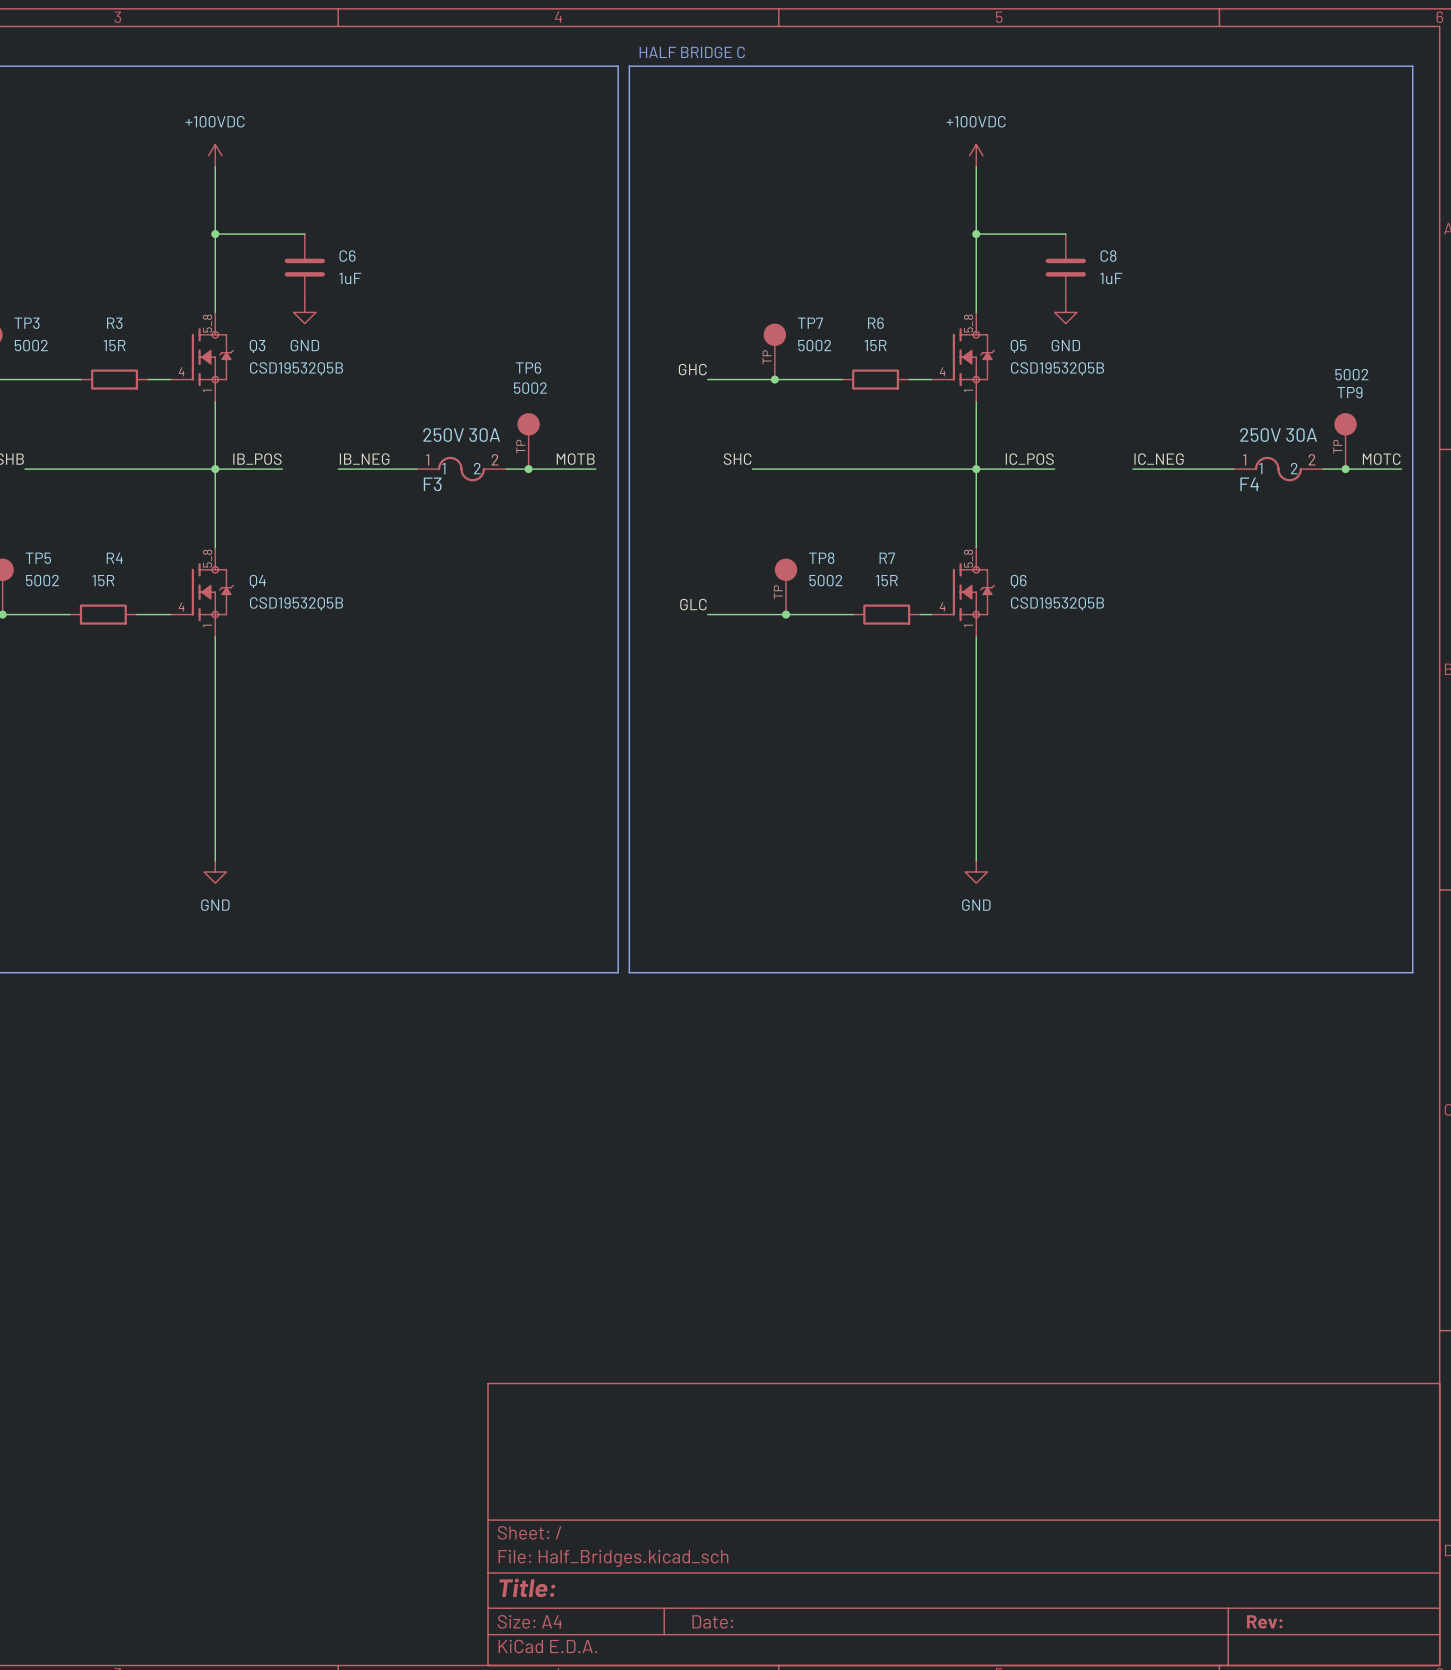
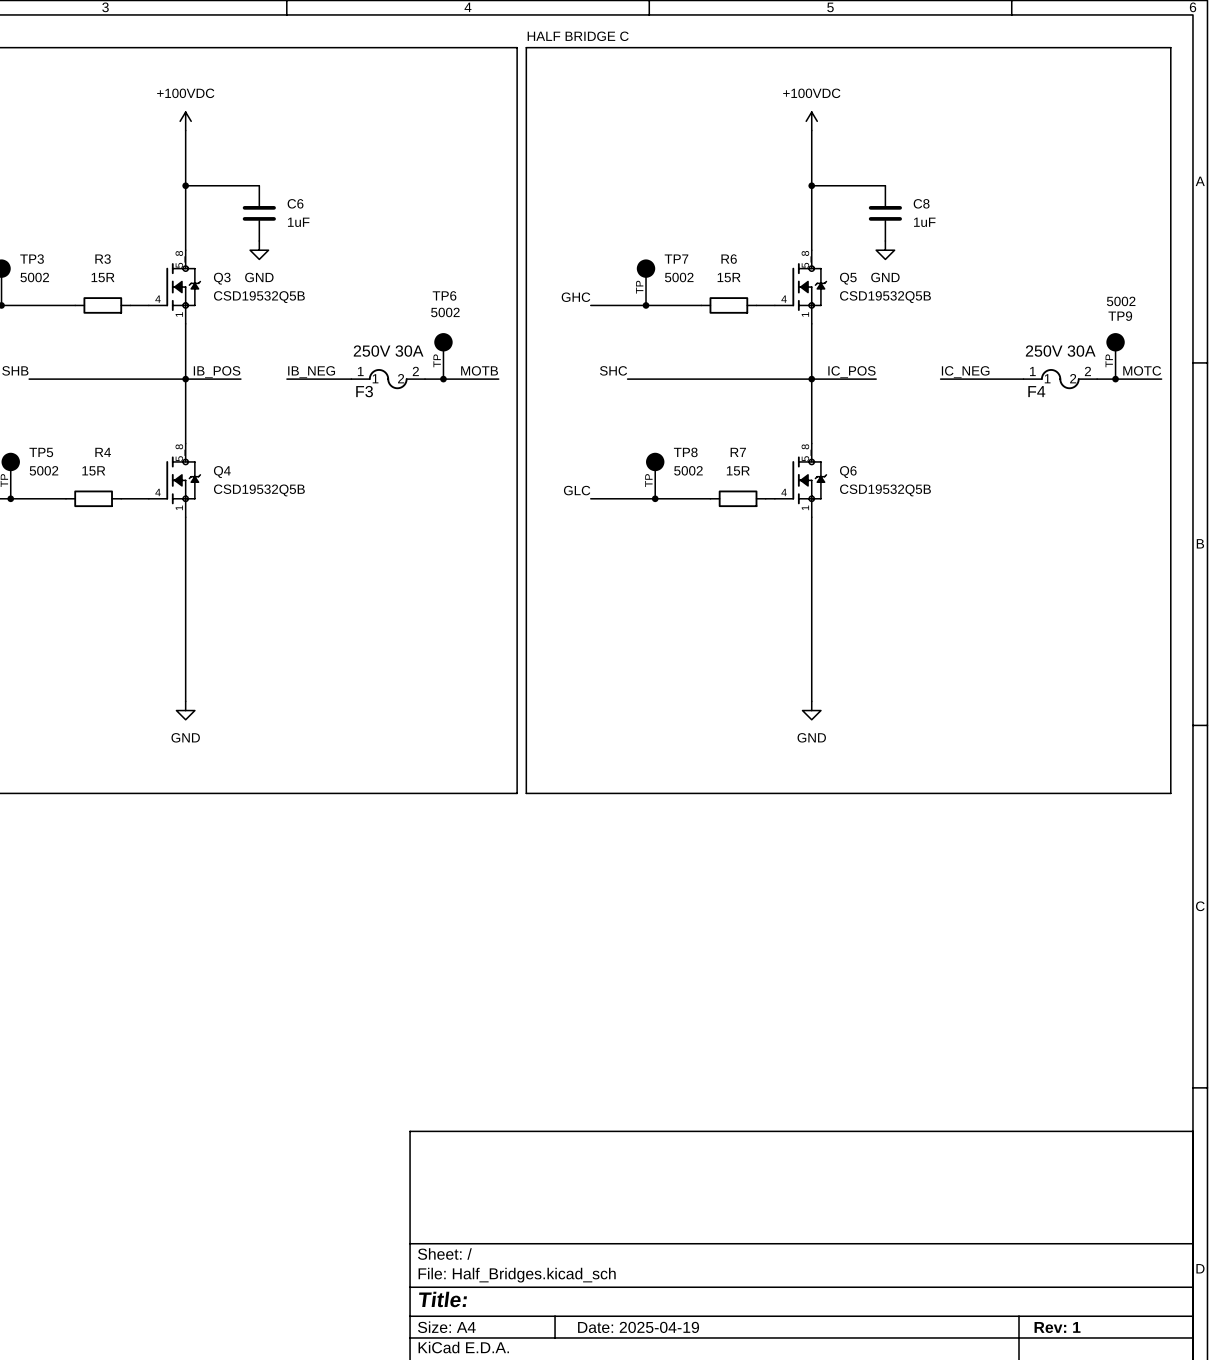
title block: Date: (712, 1621) -> Date: 2025-04-19 (638, 1327)
title block: Rev: (1264, 1621) -> Rev: 1 (1057, 1327)

